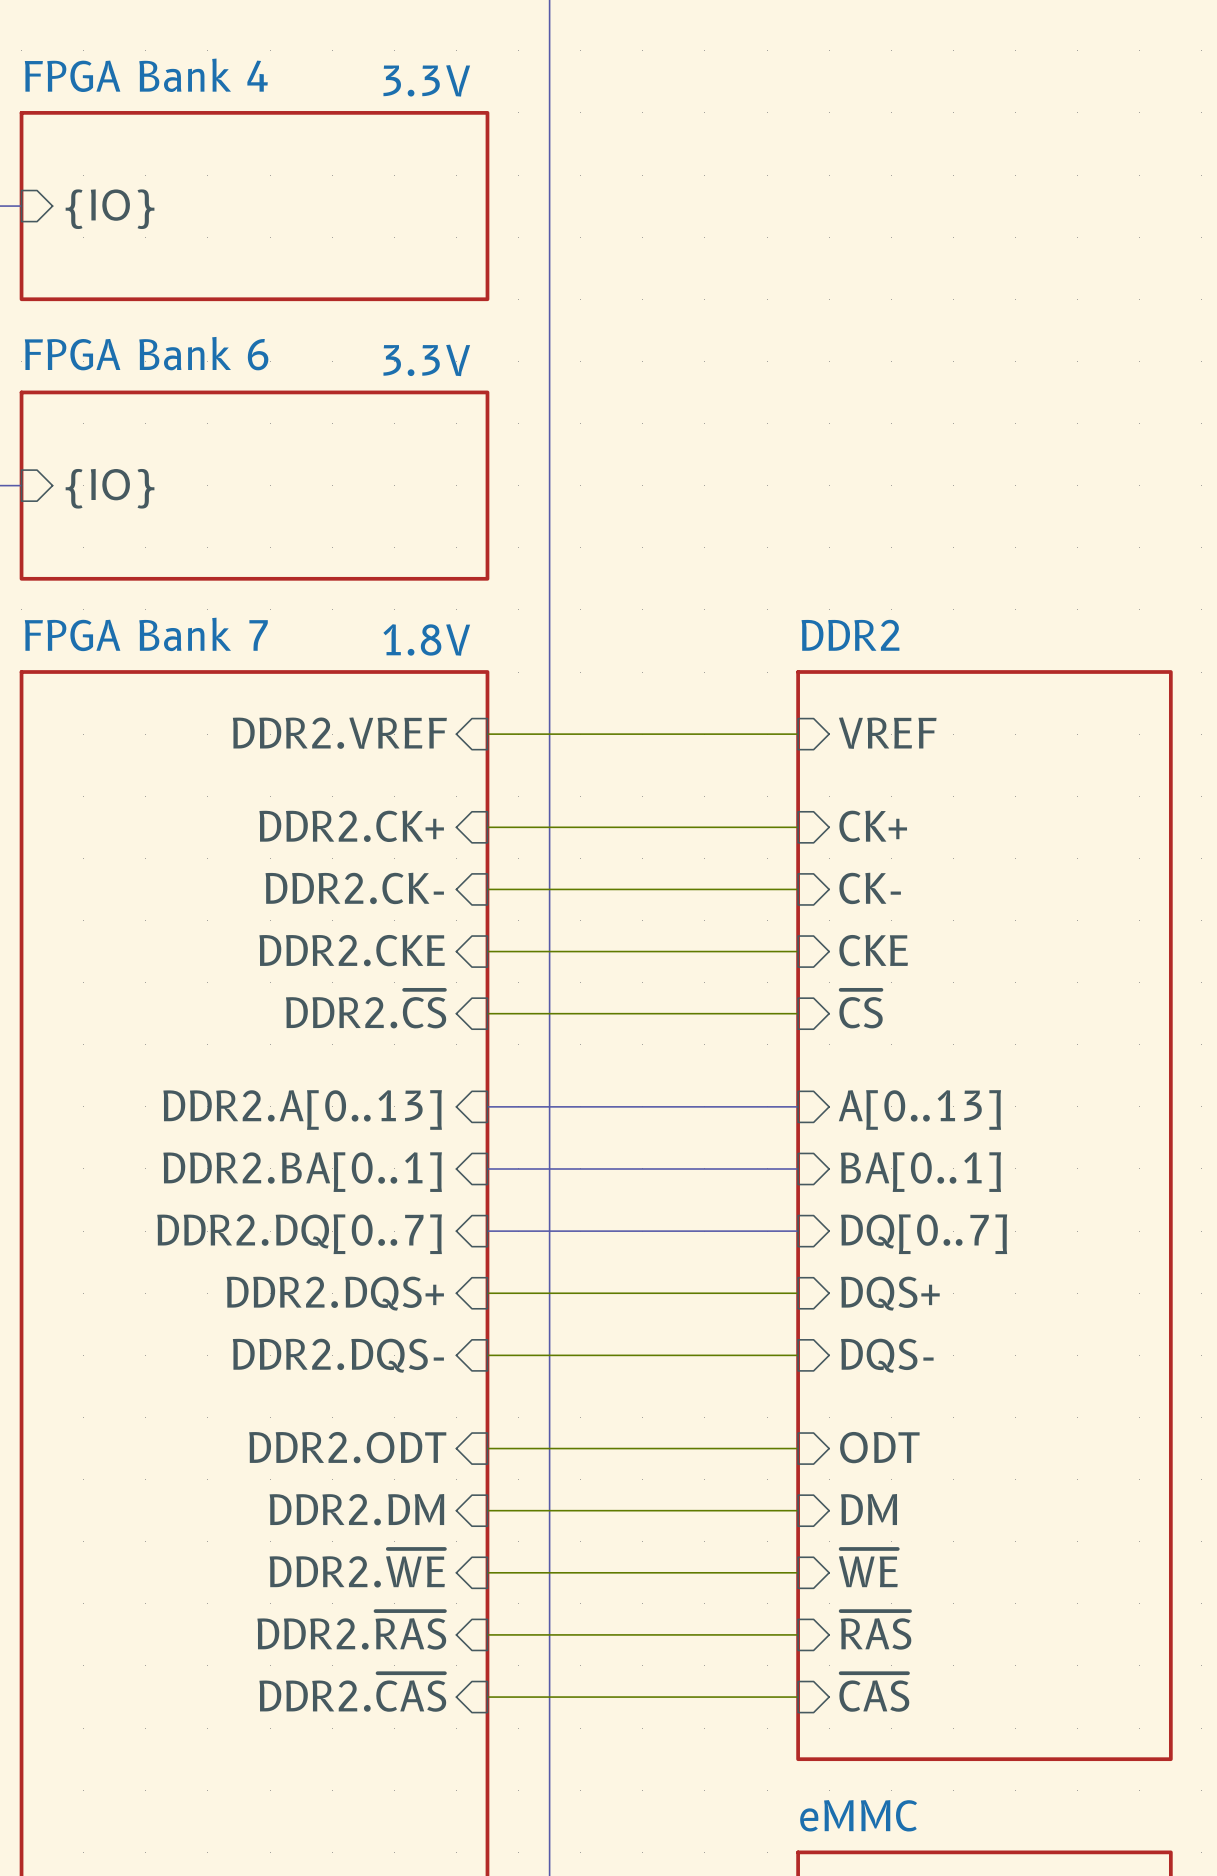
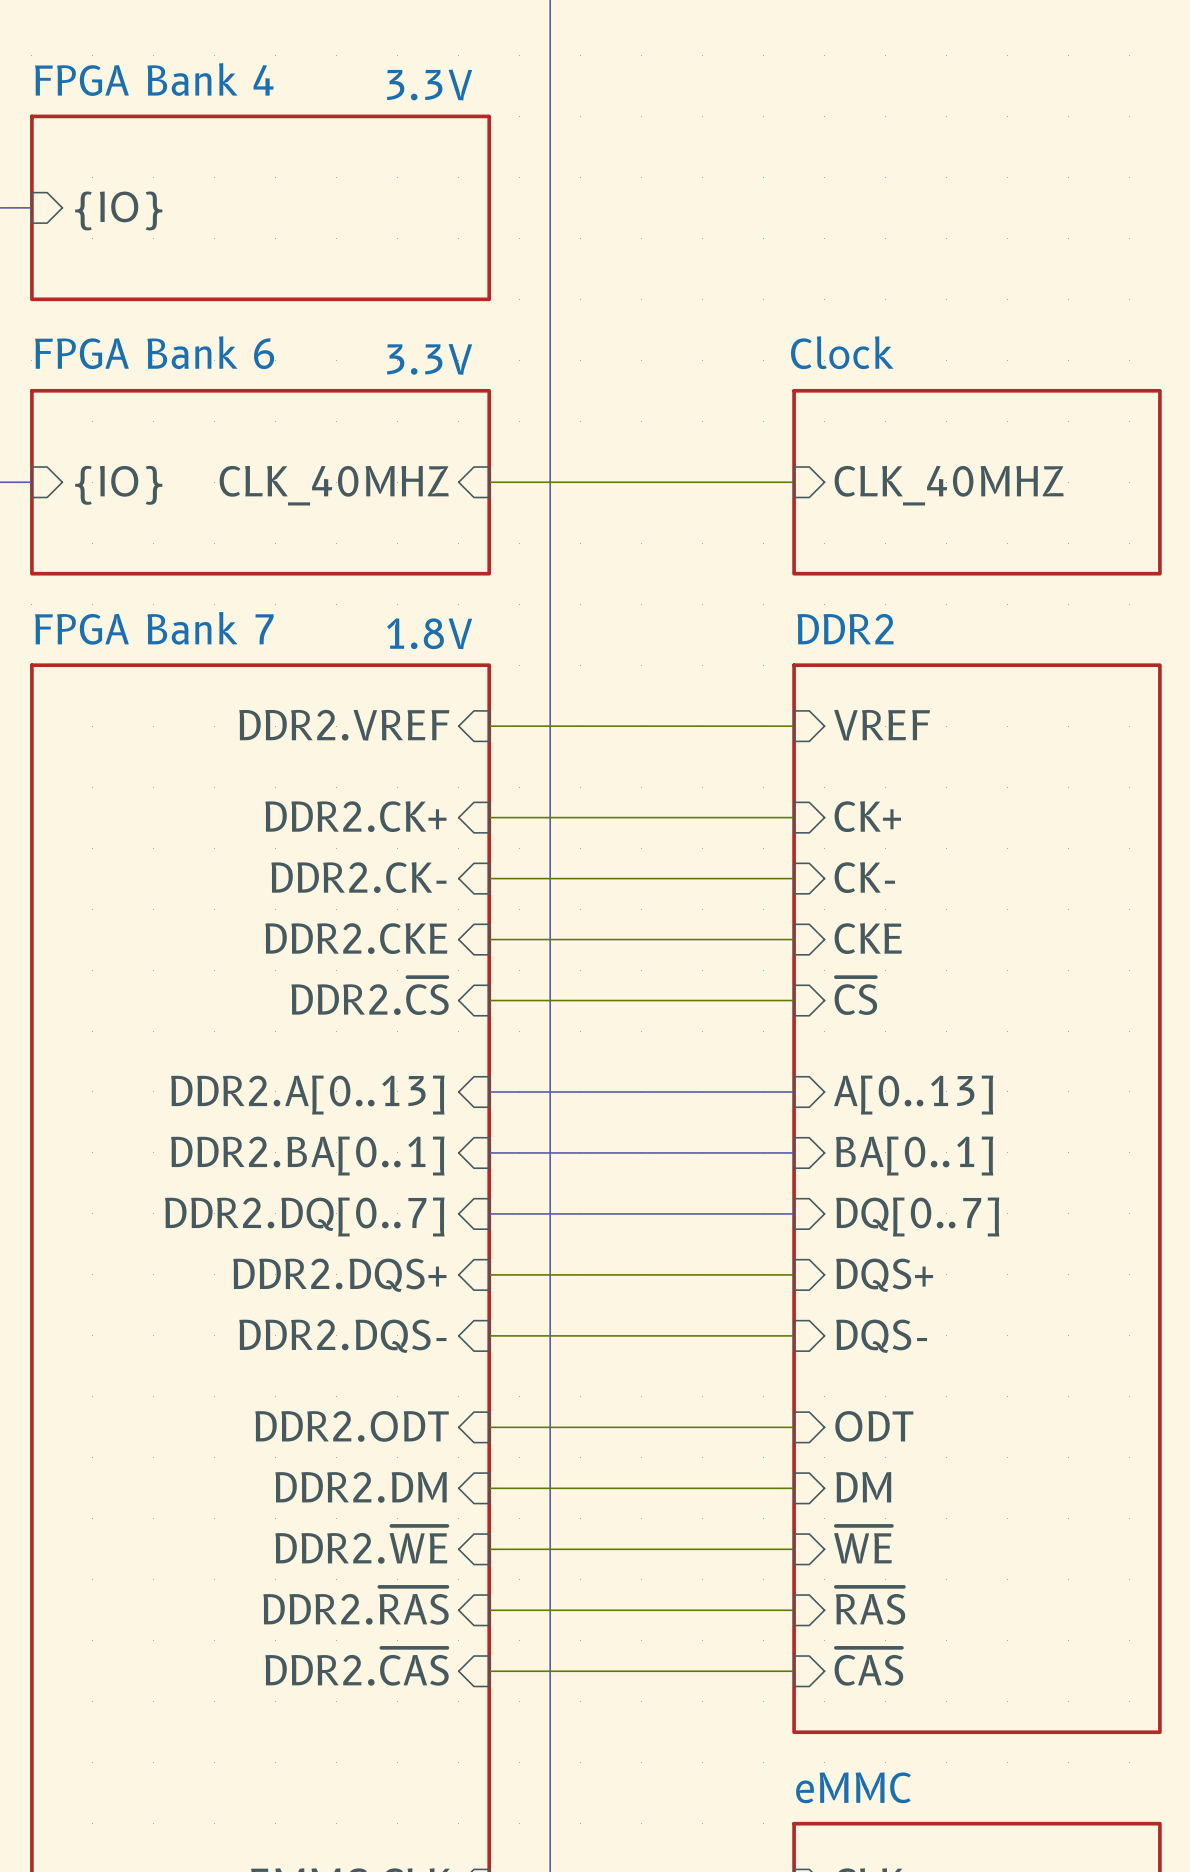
wire: none -> (489, 482) (794, 482)
sheet Clock: none -> (977, 482)
sheet pin: none -> CLK_40MHZ (334, 485)
sheet pin: none -> CLK_40MHZ (949, 485)

